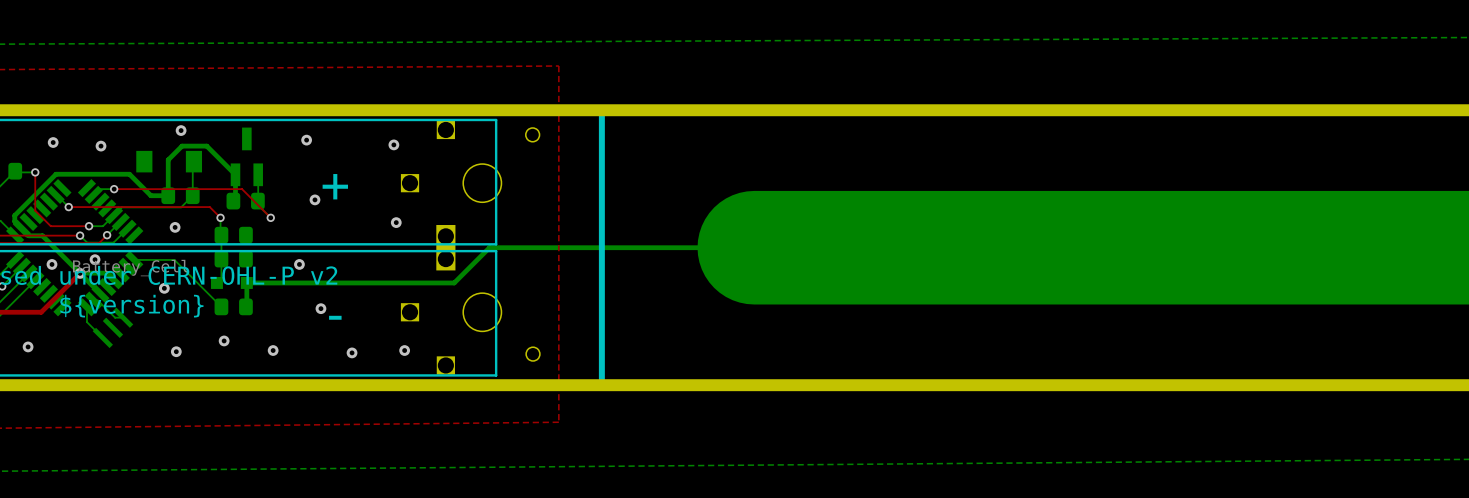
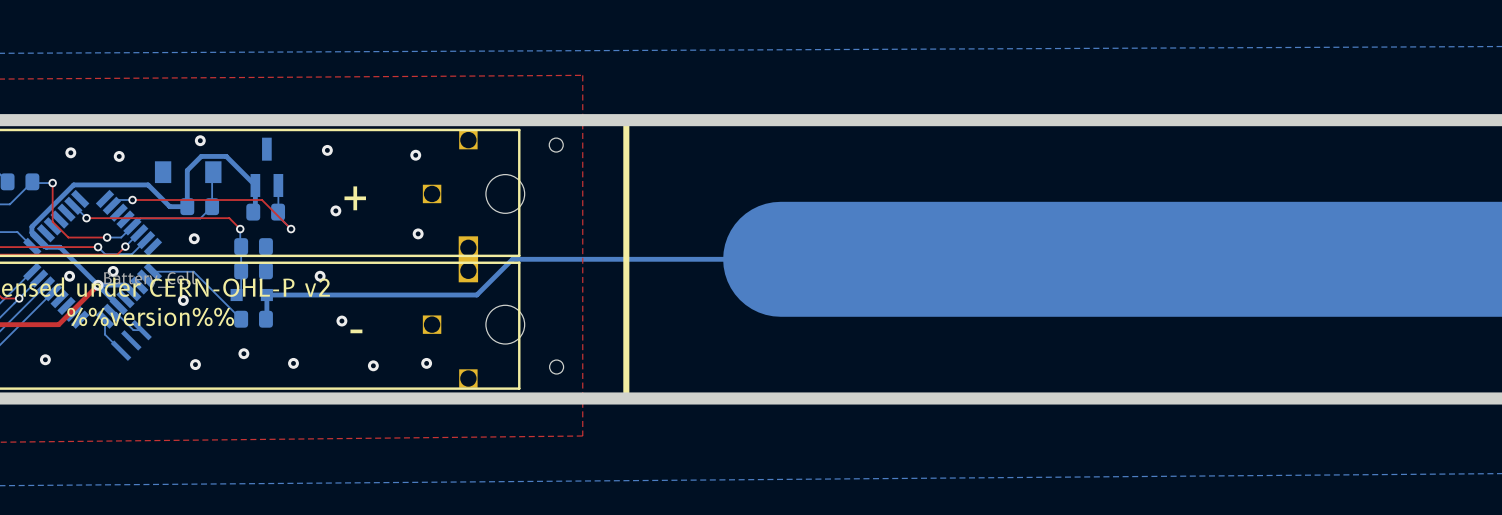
text: ${version} (131, 306) -> %%version%% (150, 316)

